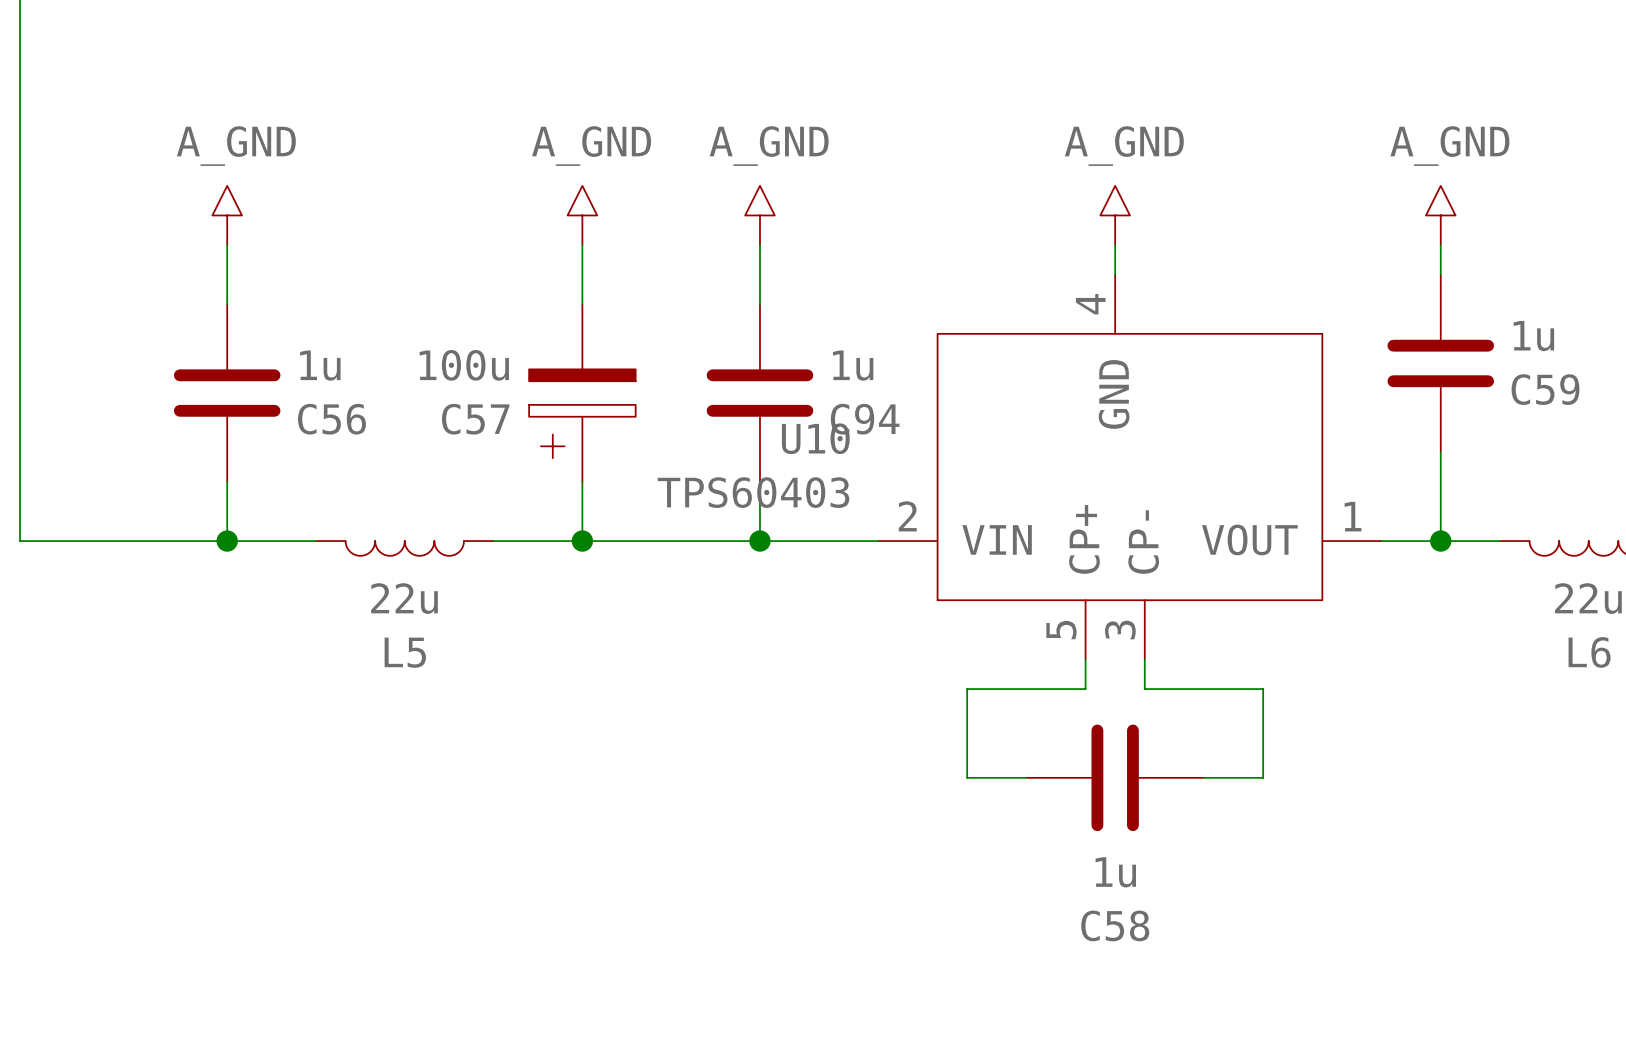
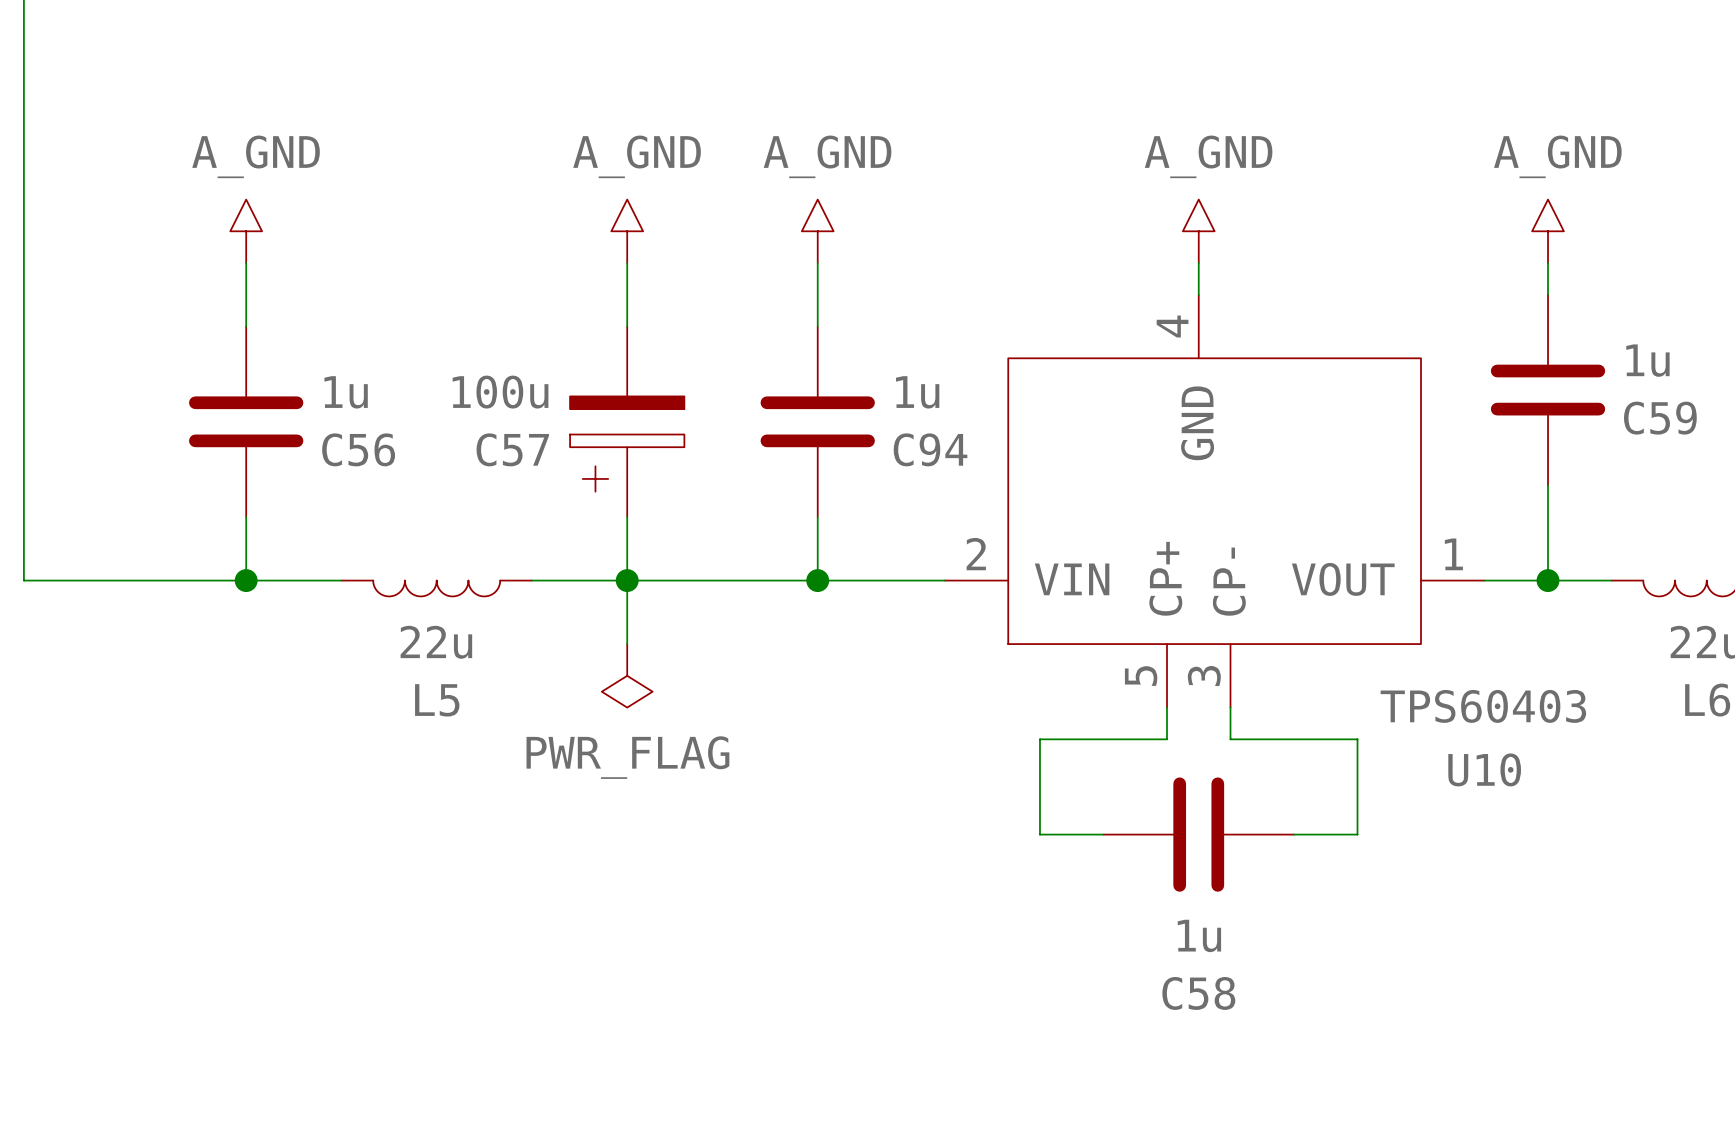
U10 name position: U10 (815, 438) -> U10 (1484, 769)
U10 value position: TPS60403 (753, 492) -> TPS60403 (1483, 706)
wire: none -> (627, 580) (627, 644)
power symbol: none -> PWR_FLAG (627, 675)

